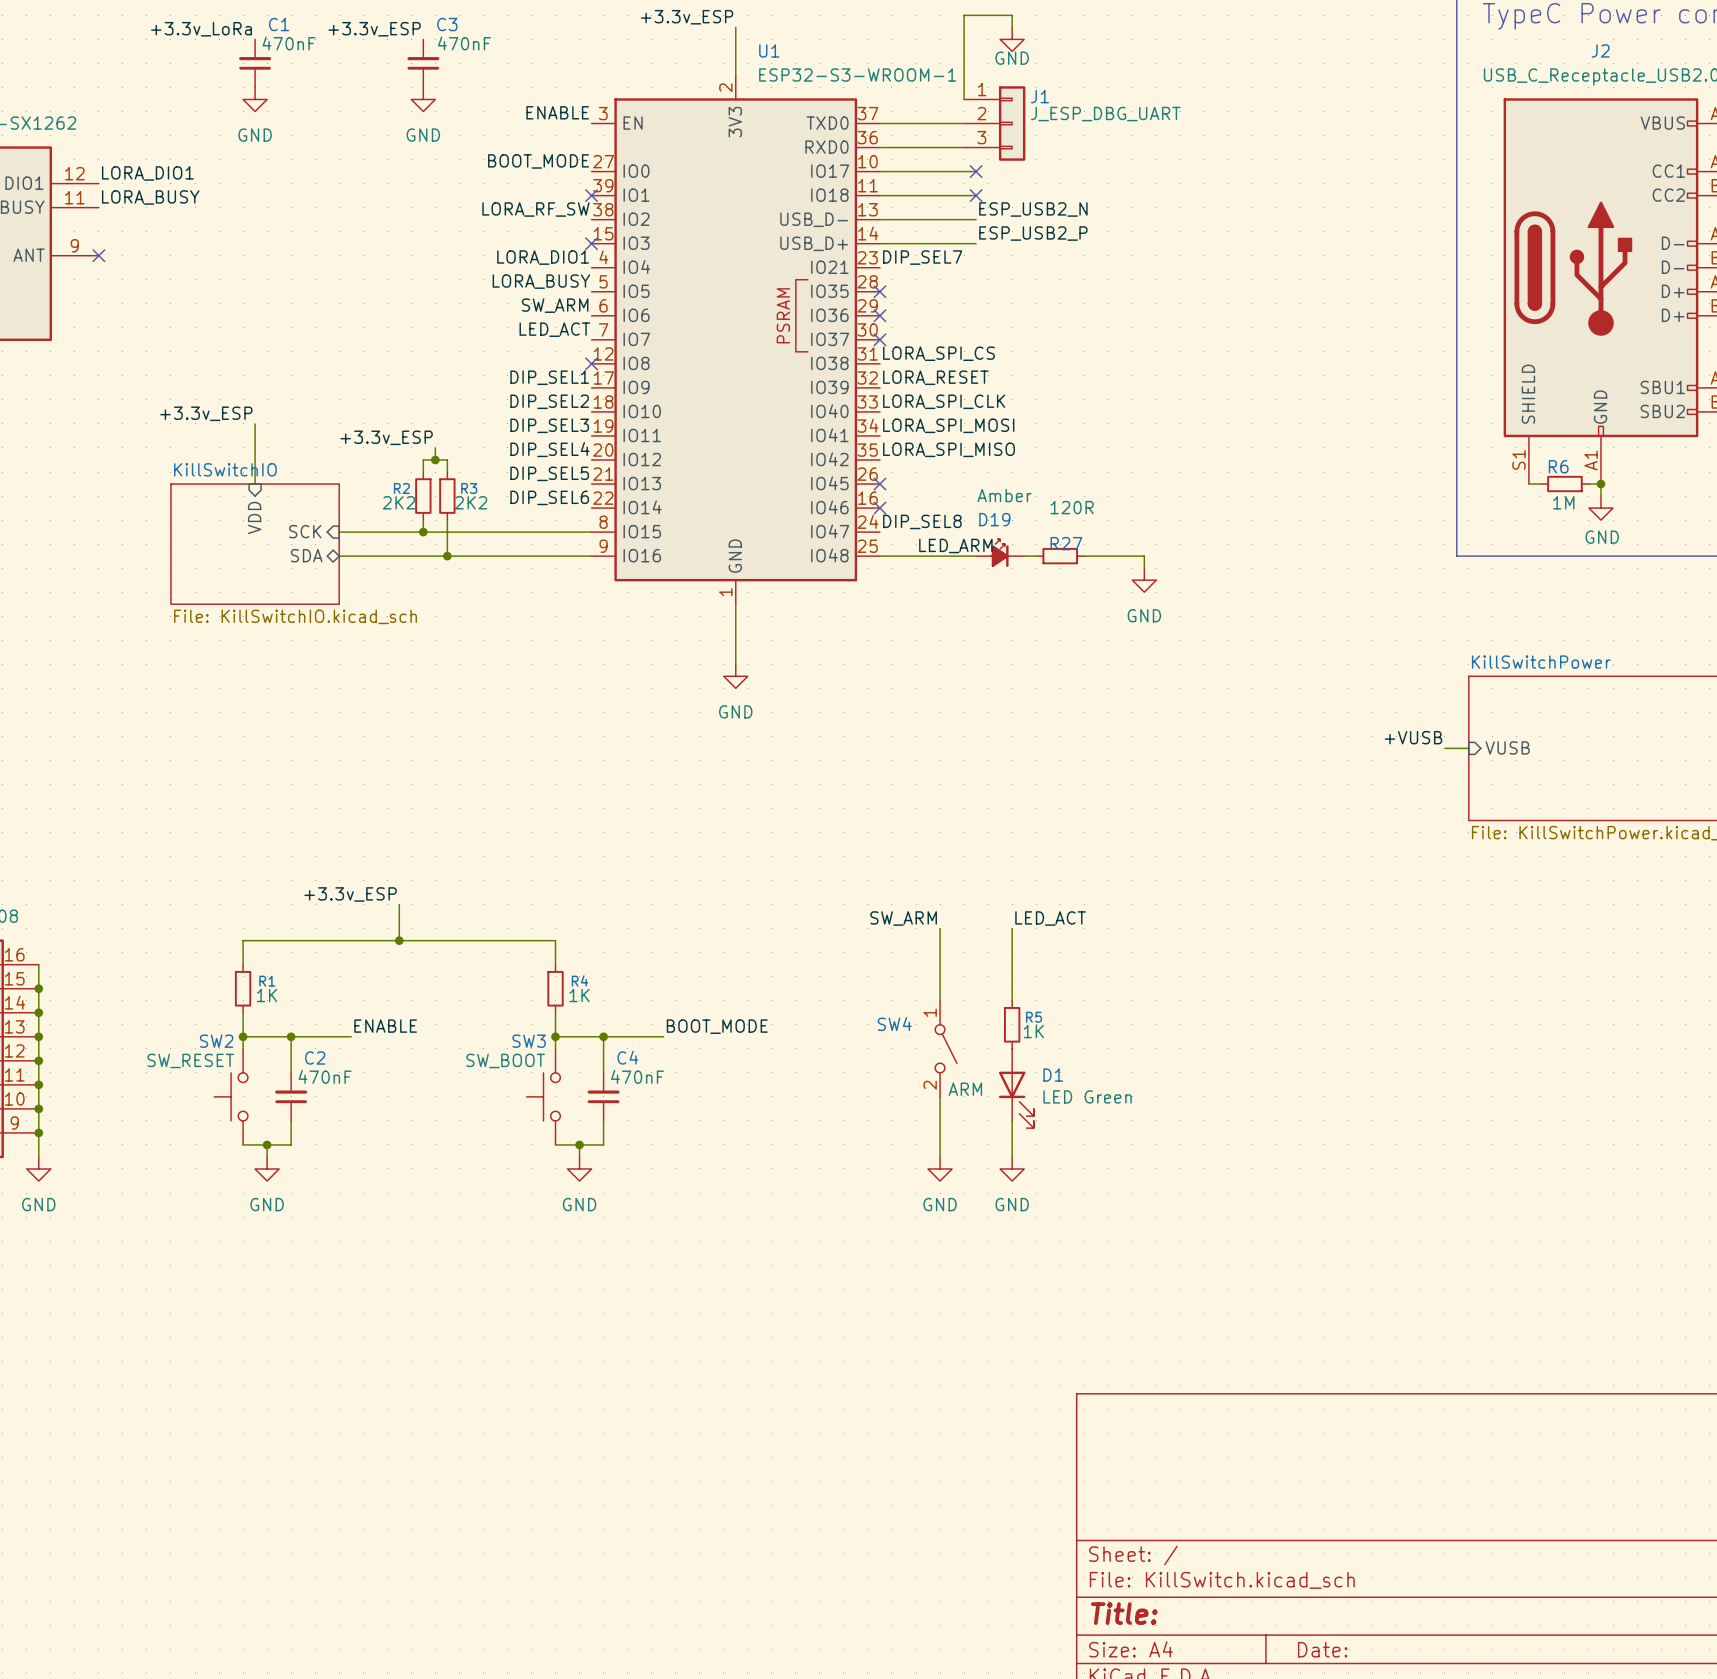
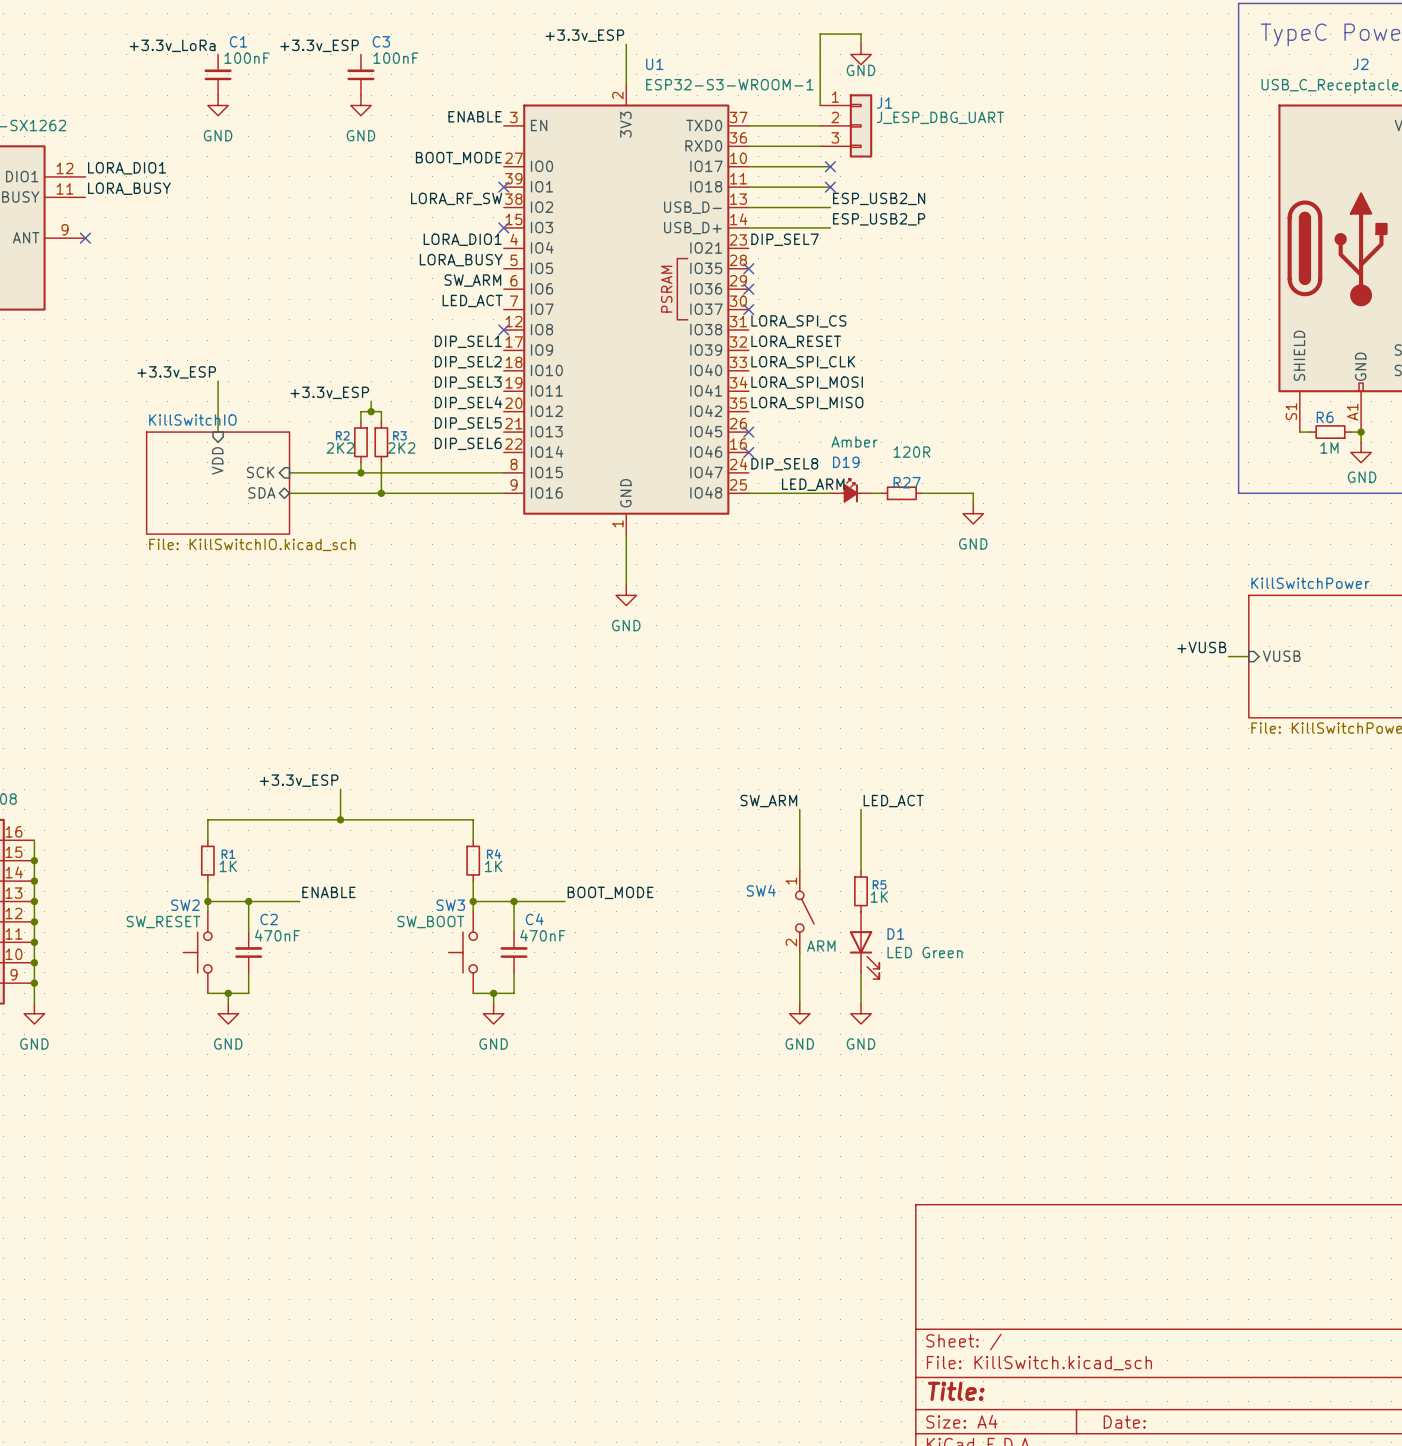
C1 value: 470nF (289, 43) -> 100nF (246, 58)
C3 value: 470nF (464, 43) -> 100nF (395, 58)

